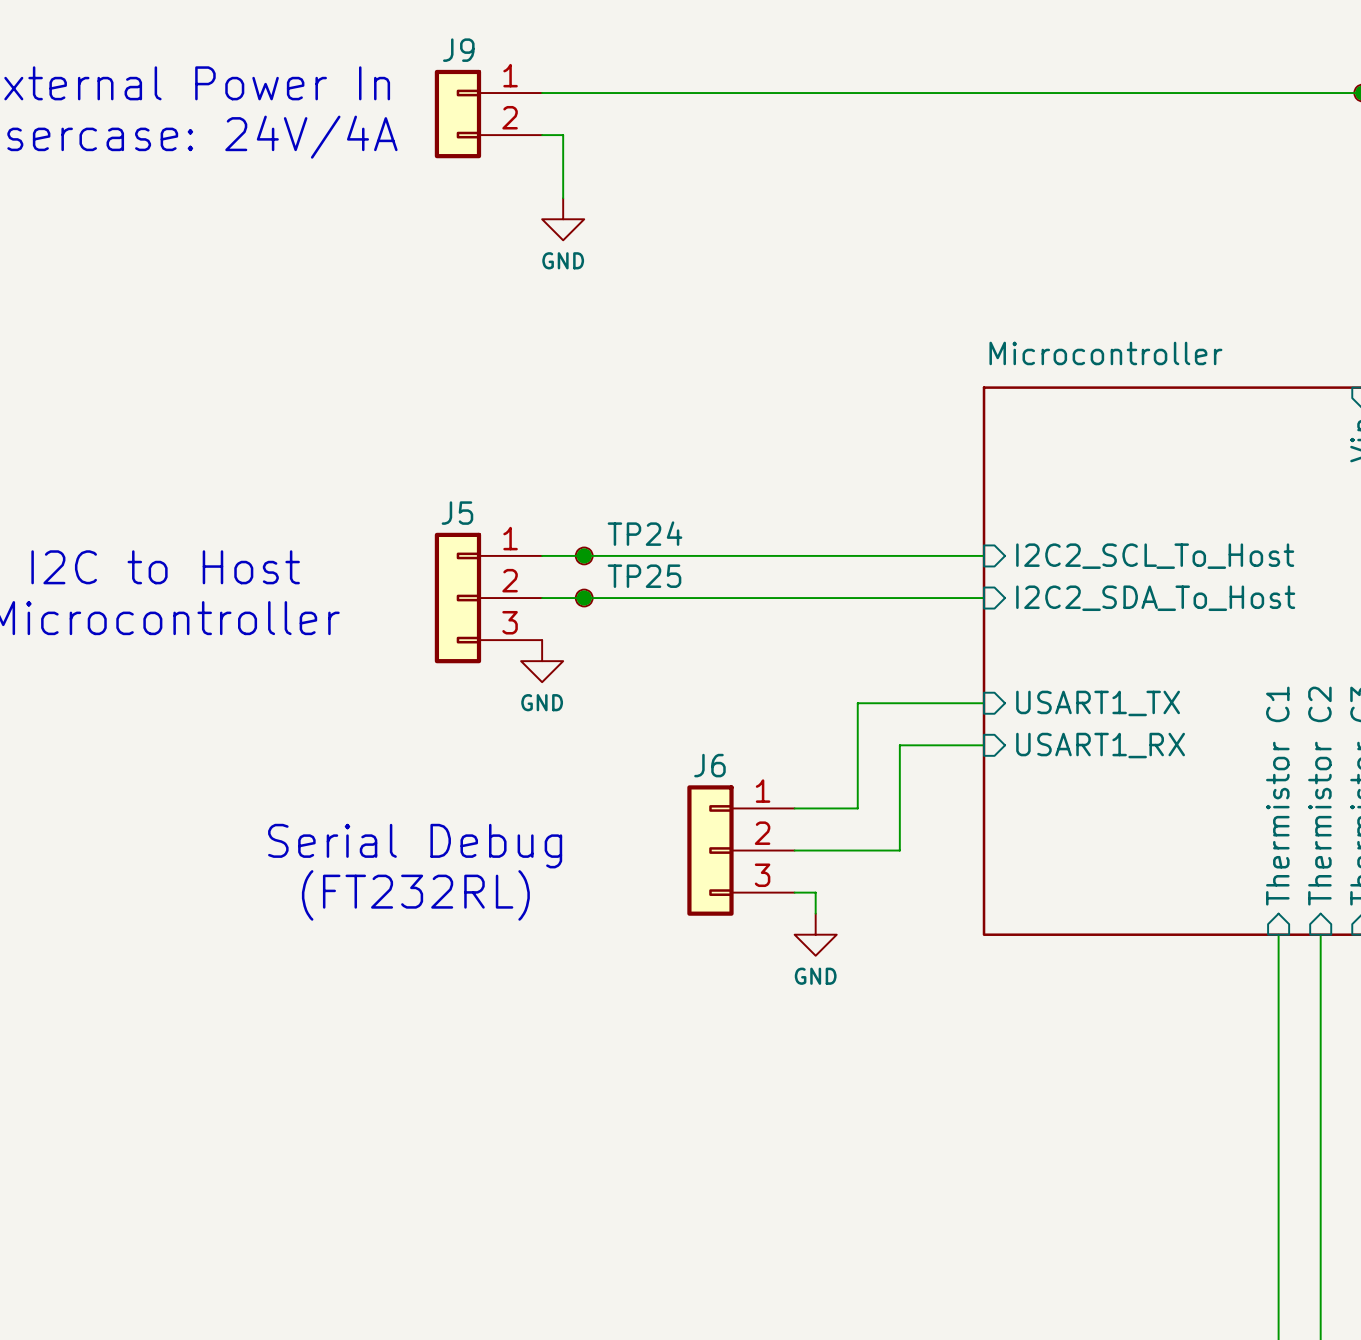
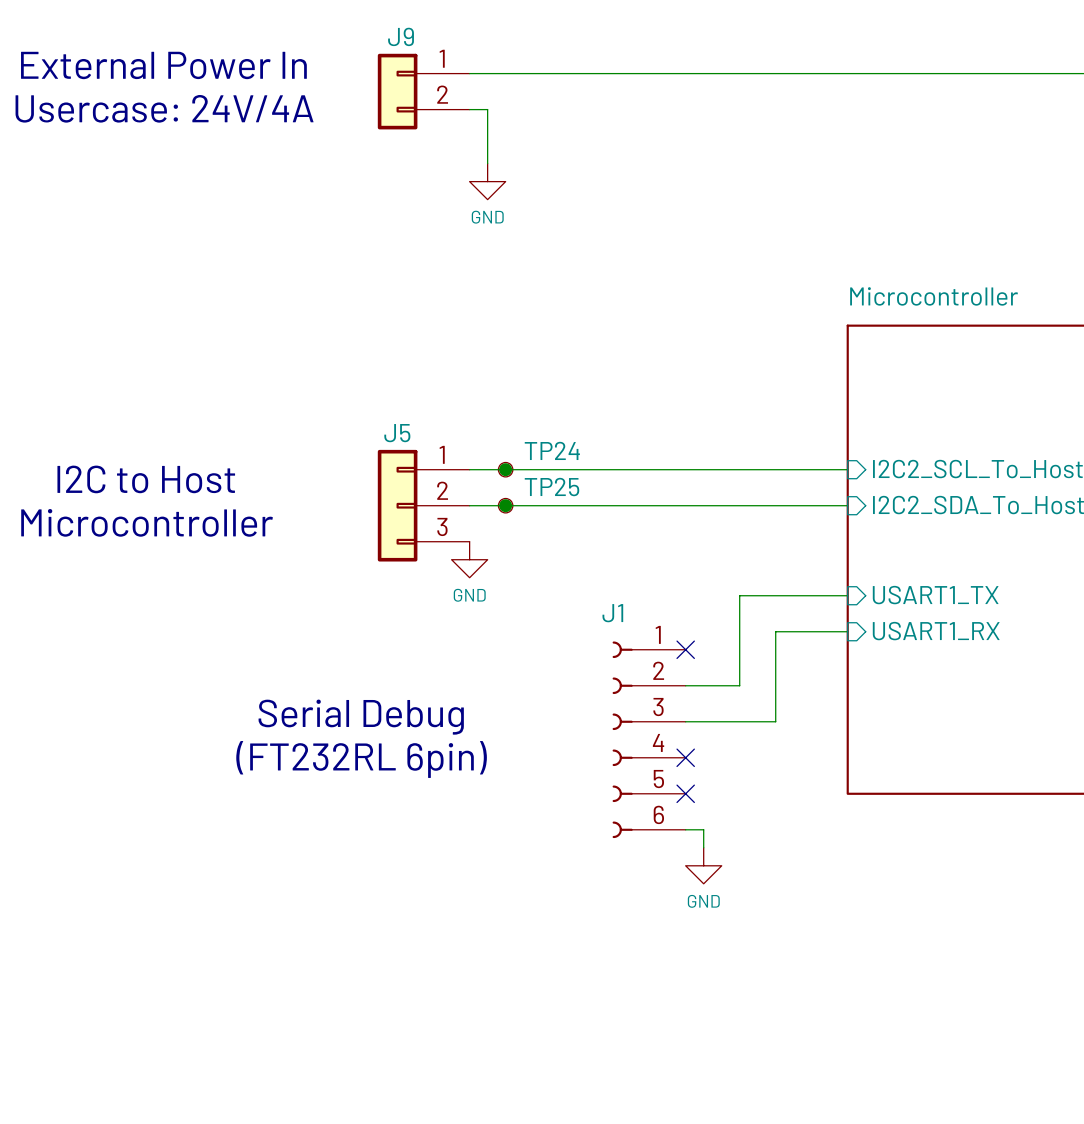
no-connect mark: none -> (685, 649)
J6: (740, 850) -> none
J1: none -> (649, 739)
wire: (794, 892) (815, 892) (815, 913) -> (685, 829) (703, 829) (703, 847)
no-connect mark: none -> (685, 757)
text: (FT232RL) (415, 895) -> (FT232RL 6pin) (361, 759)
no-connect mark: none -> (685, 793)
power symbol position: GND (815, 934) -> GND (703, 865)

